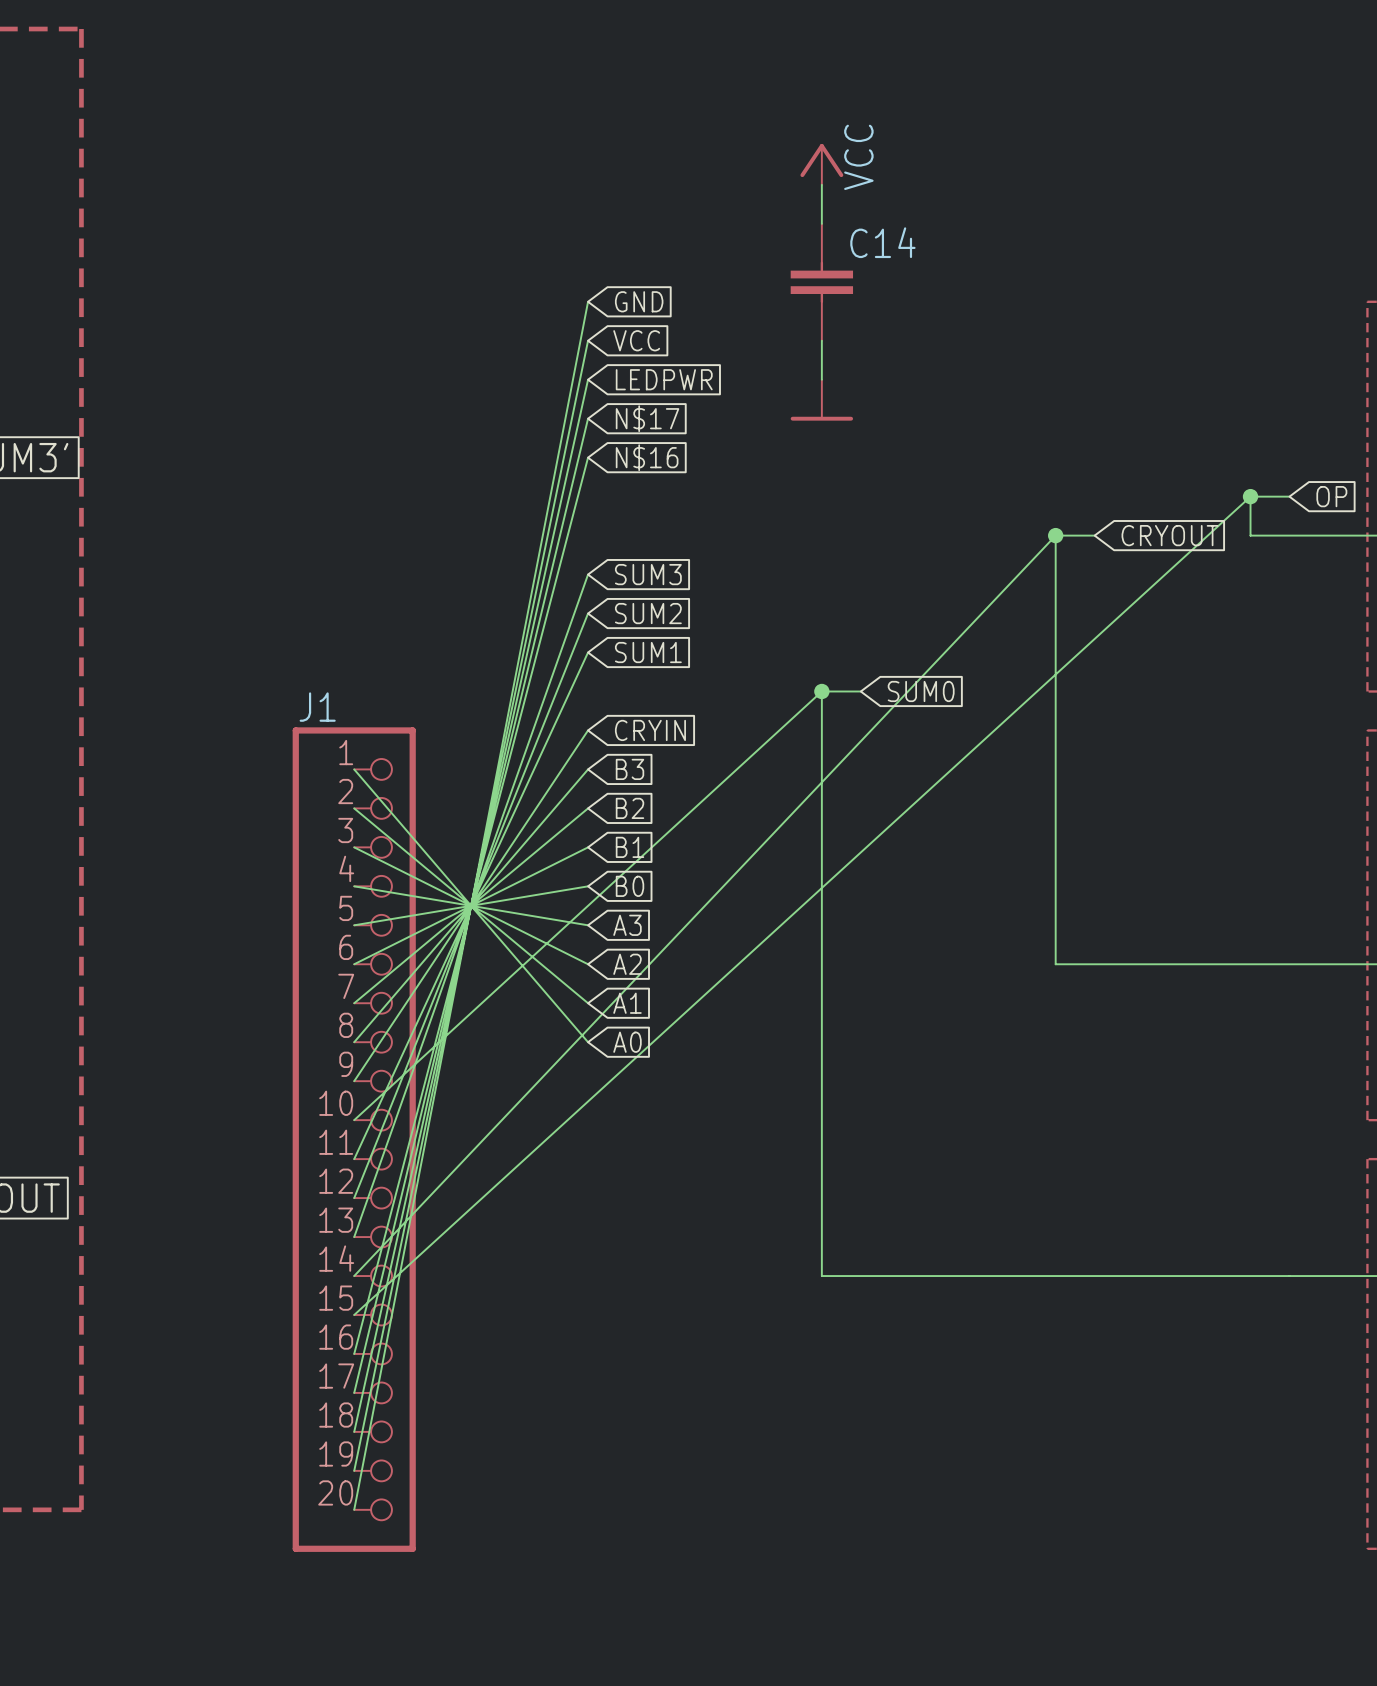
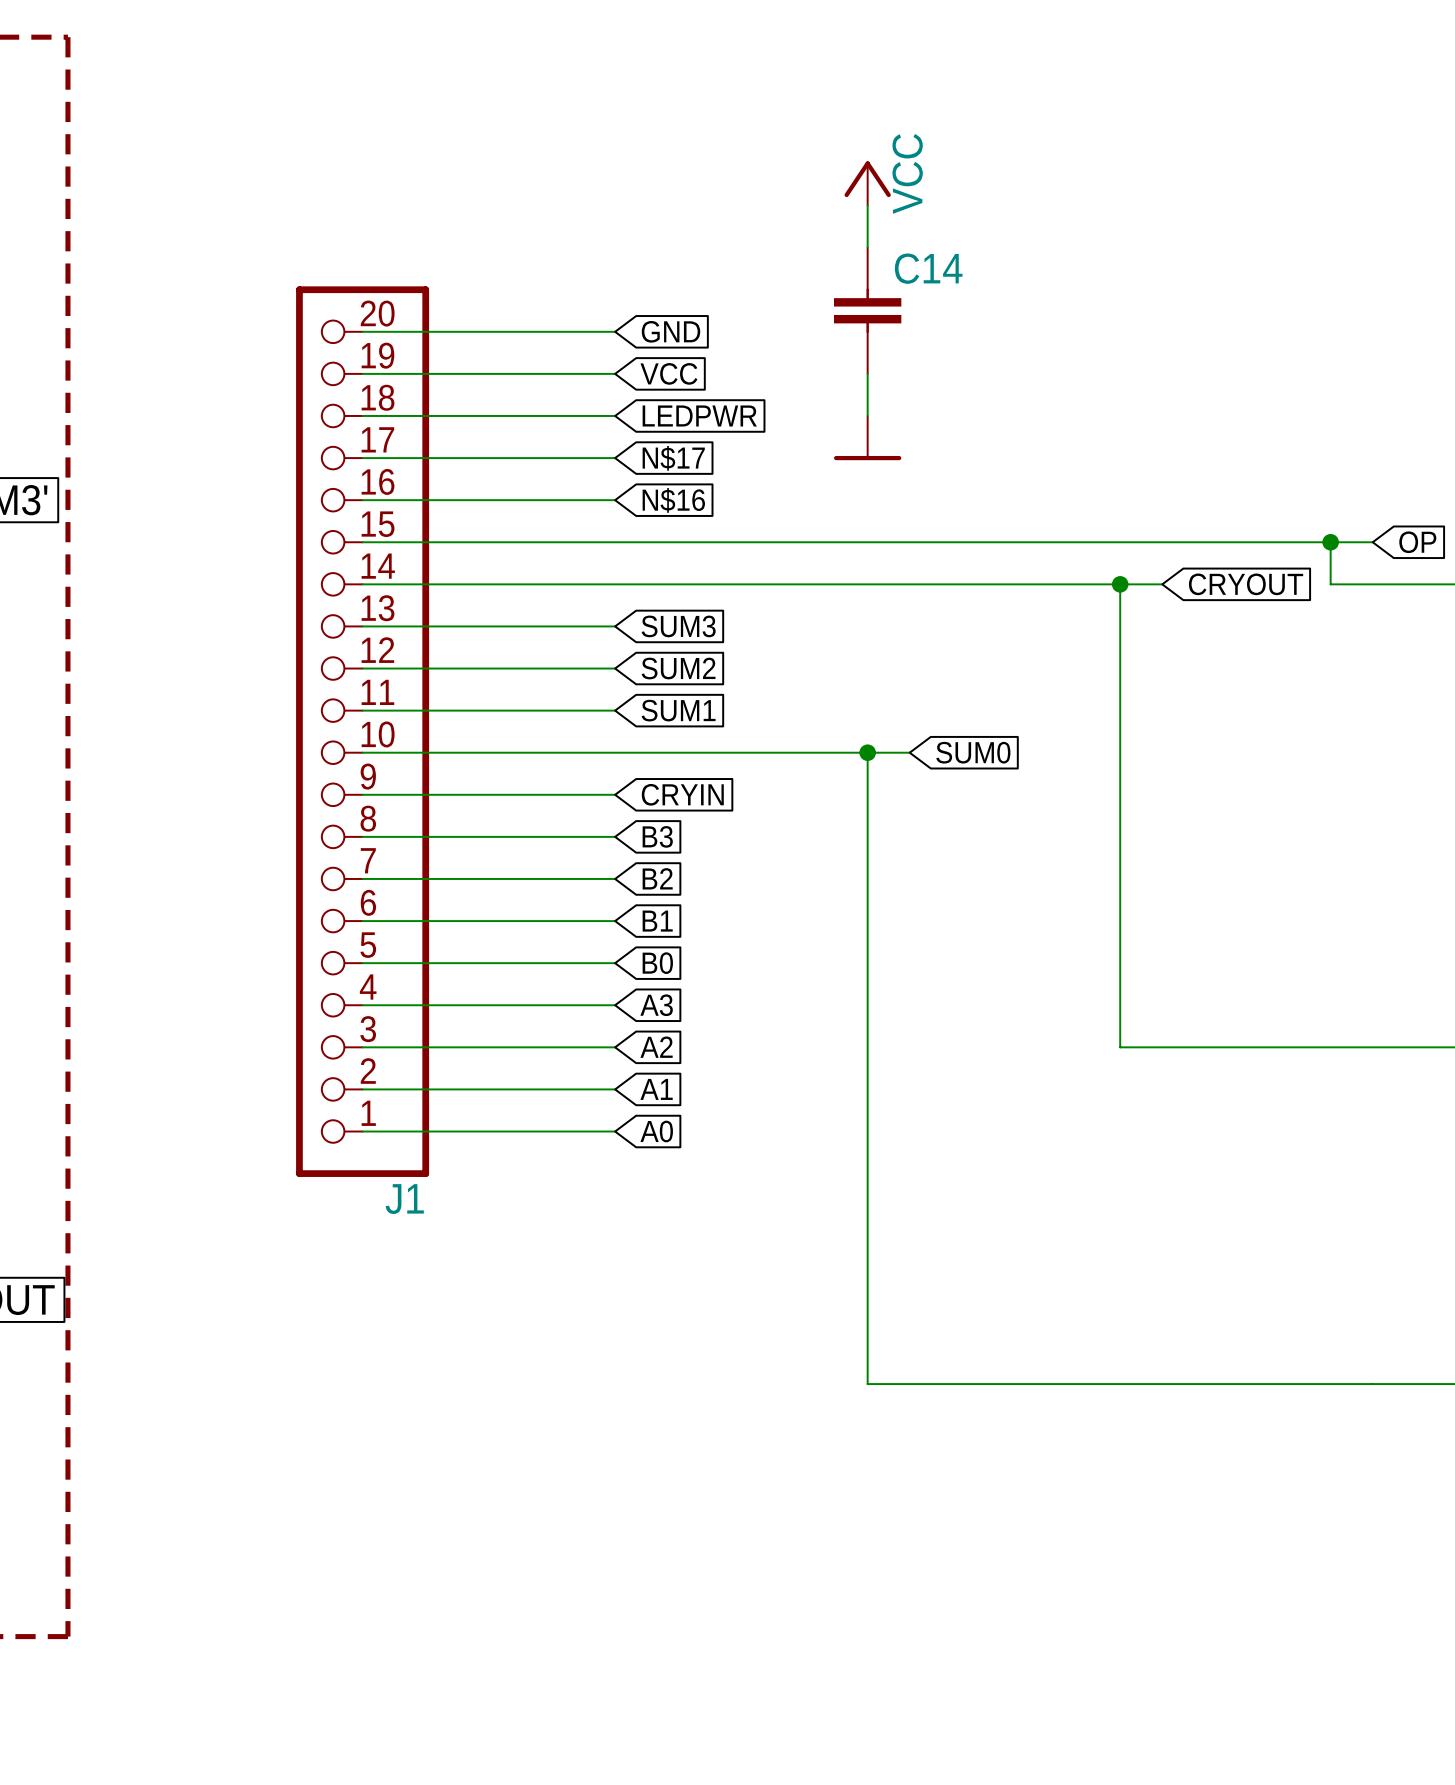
wire: (588, 301) (354, 1509) -> (615, 331) (362, 331)
wire: (588, 340) (354, 1470) -> (615, 373) (362, 373)
wire: (588, 379) (354, 1431) -> (615, 415) (362, 415)
wire: (588, 418) (354, 1392) -> (615, 458) (362, 458)
wire: (588, 457) (354, 1353) -> (615, 500) (362, 500)
wire: (1250, 496) (354, 1314) -> (1330, 542) (362, 542)
wire: (1055, 535) (354, 1276) -> (1120, 584) (362, 584)
wire: (588, 574) (354, 1237) -> (615, 626) (362, 626)
wire: (588, 613) (354, 1198) -> (615, 668) (362, 668)
wire: (588, 652) (354, 1159) -> (615, 710) (362, 710)
wire: (821, 691) (354, 1120) -> (867, 752) (362, 752)
wire: (588, 730) (354, 1081) -> (615, 794) (362, 794)
wire: (354, 769) (588, 1042) -> (362, 836) (615, 836)
wire: (588, 769) (354, 1042) -> (615, 1131) (362, 1131)
wire: (354, 808) (588, 1003) -> (362, 878) (615, 878)
wire: (588, 808) (354, 1003) -> (615, 1089) (362, 1089)
wire: (354, 847) (588, 964) -> (362, 921) (615, 921)
wire: (588, 847) (354, 964) -> (615, 1047) (362, 1047)
wire: (354, 886) (588, 925) -> (362, 963) (615, 963)
wire: (588, 886) (354, 925) -> (615, 1005) (362, 1005)
J1 rotation: 0° (354, 1139) -> 180° (362, 731)

